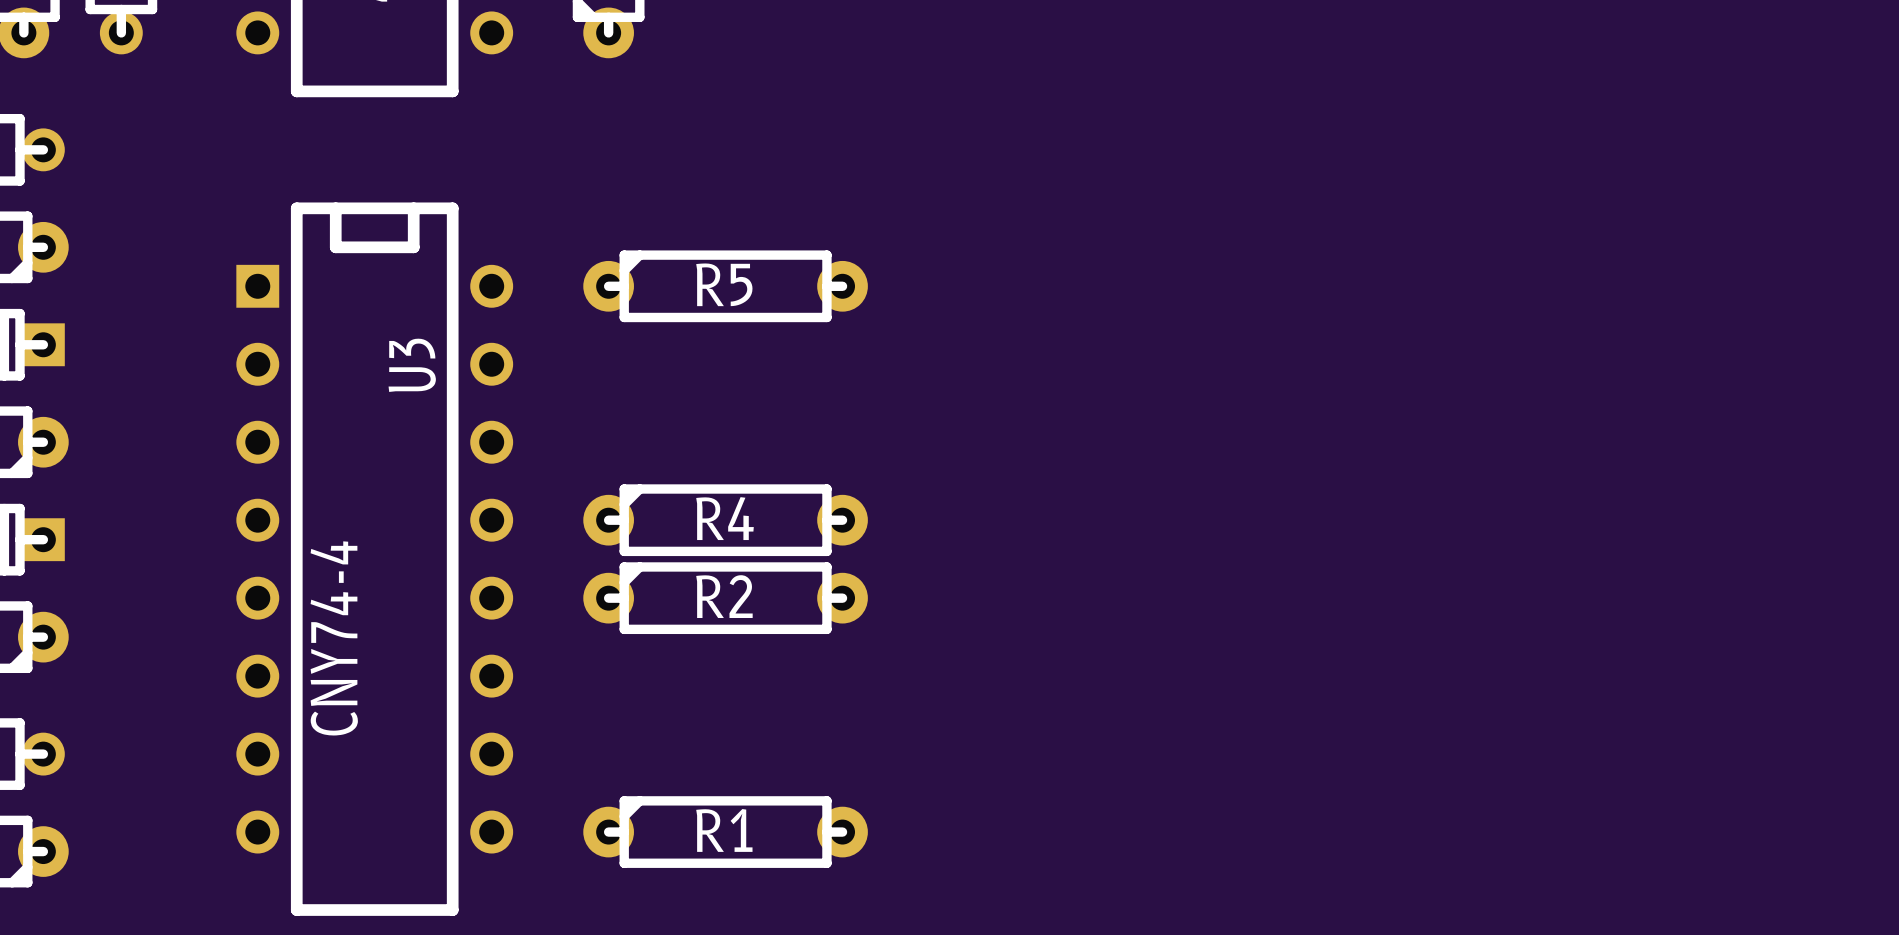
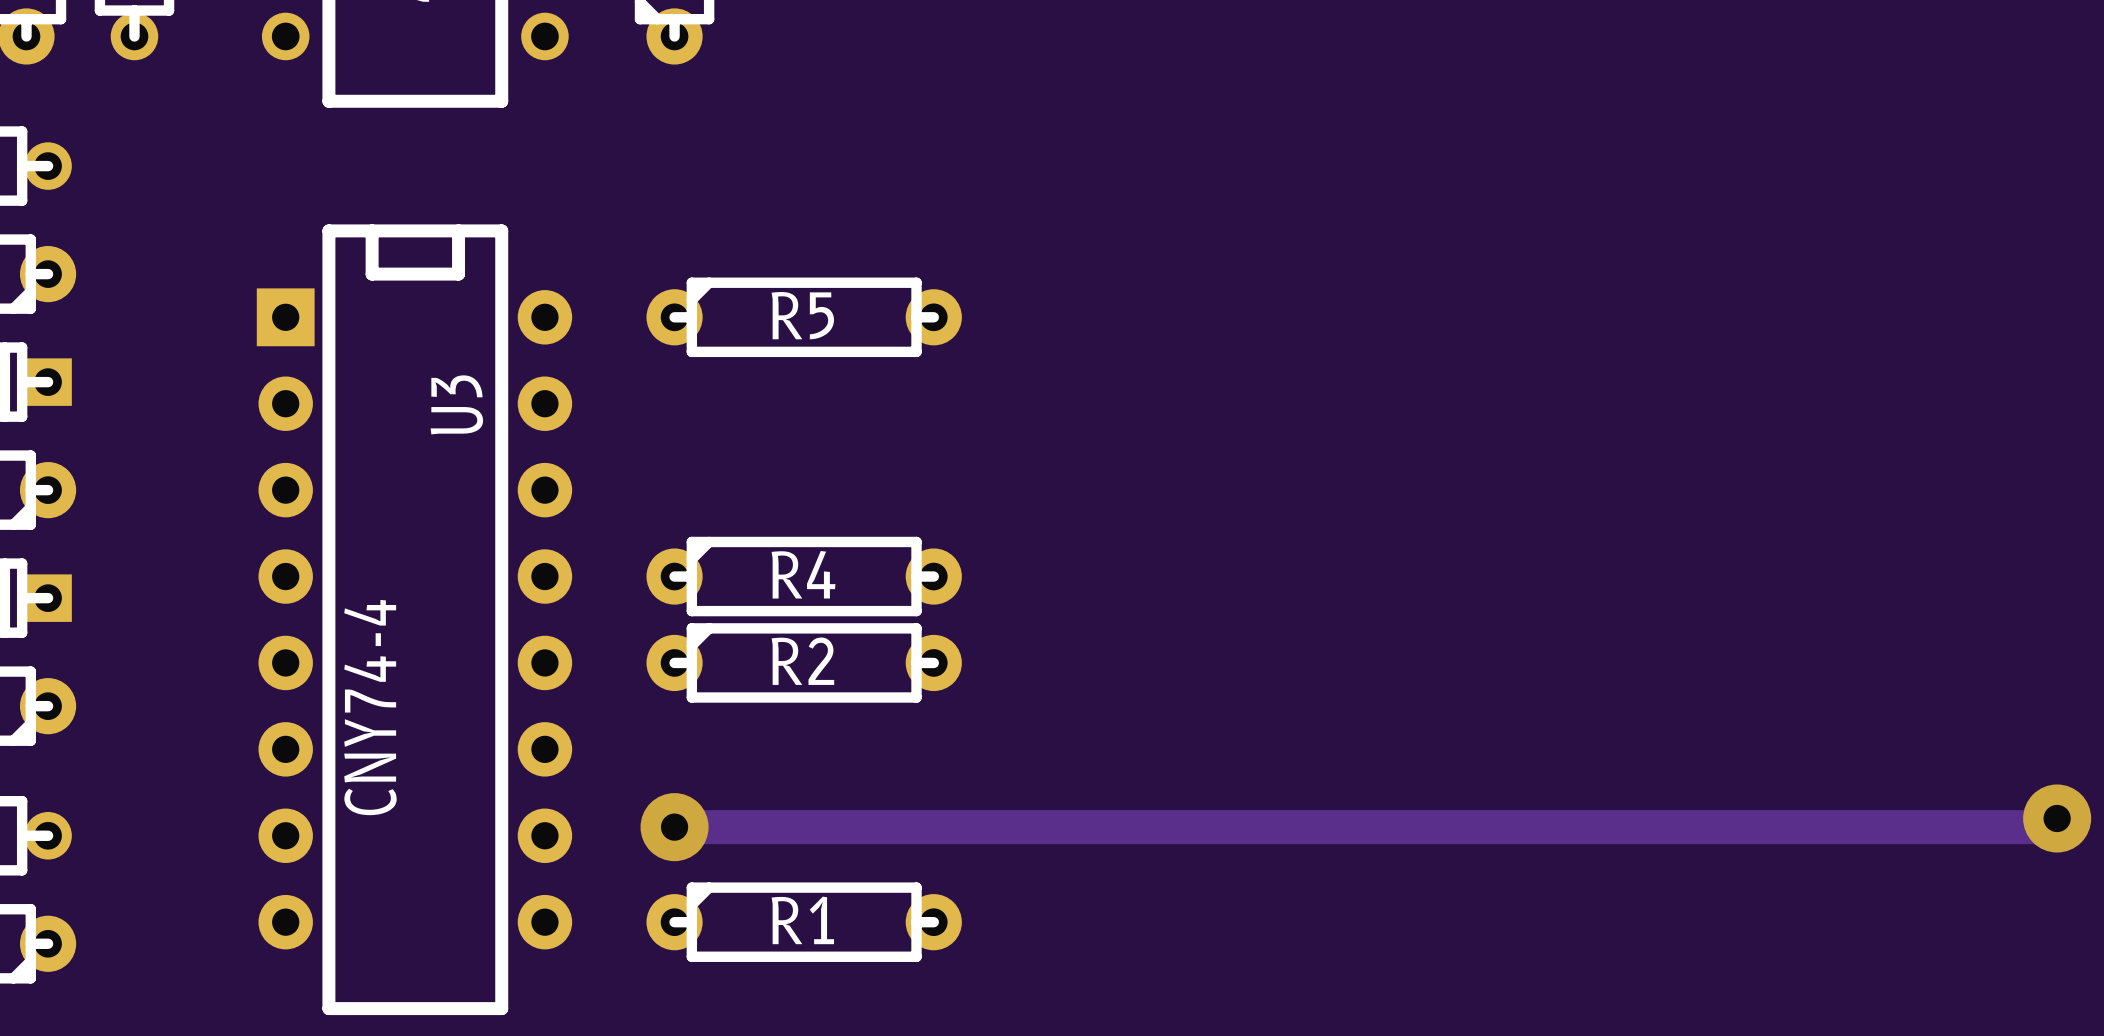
U3 footprint: [236, 202, 514, 916] -> [256, 224, 573, 1016]
track: none -> (2057, 818) (2048, 827) (674, 827)
via: none -> (2057, 818)
via: none -> (674, 827)

